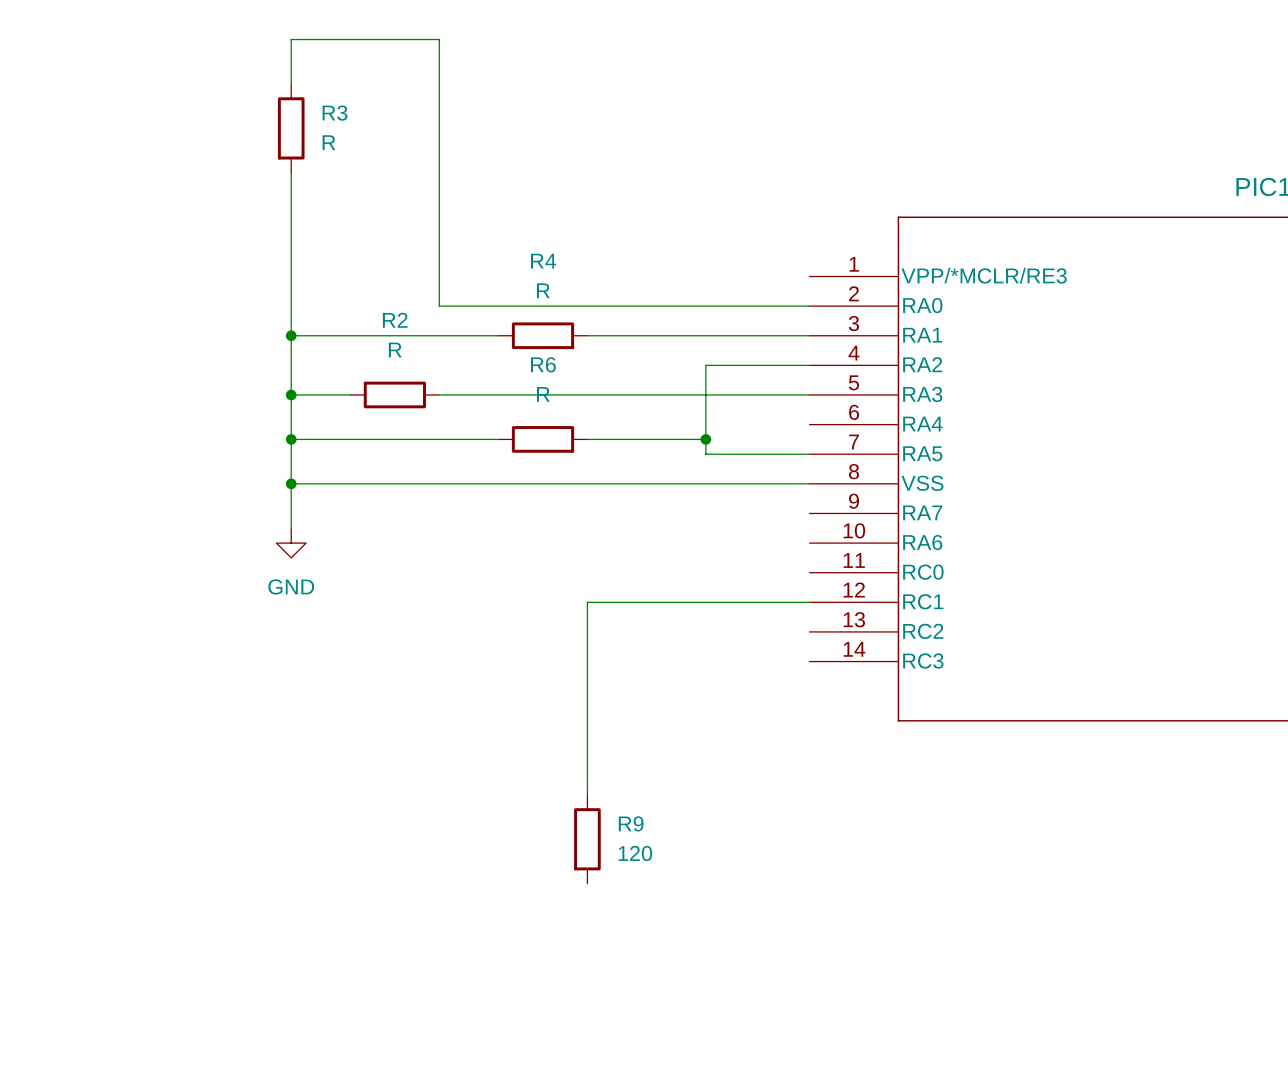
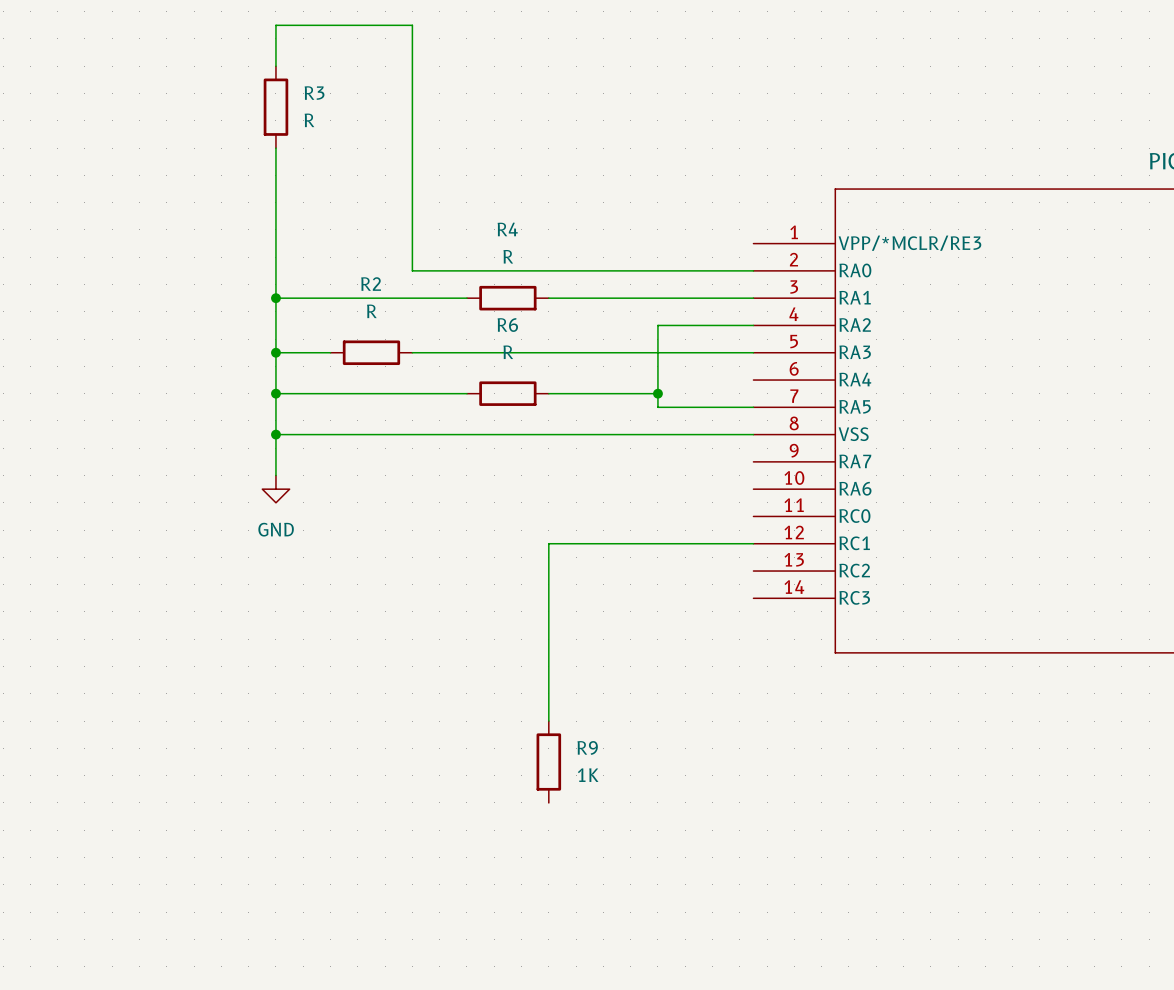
R9 value: 120 (635, 853) -> 1K (588, 775)

